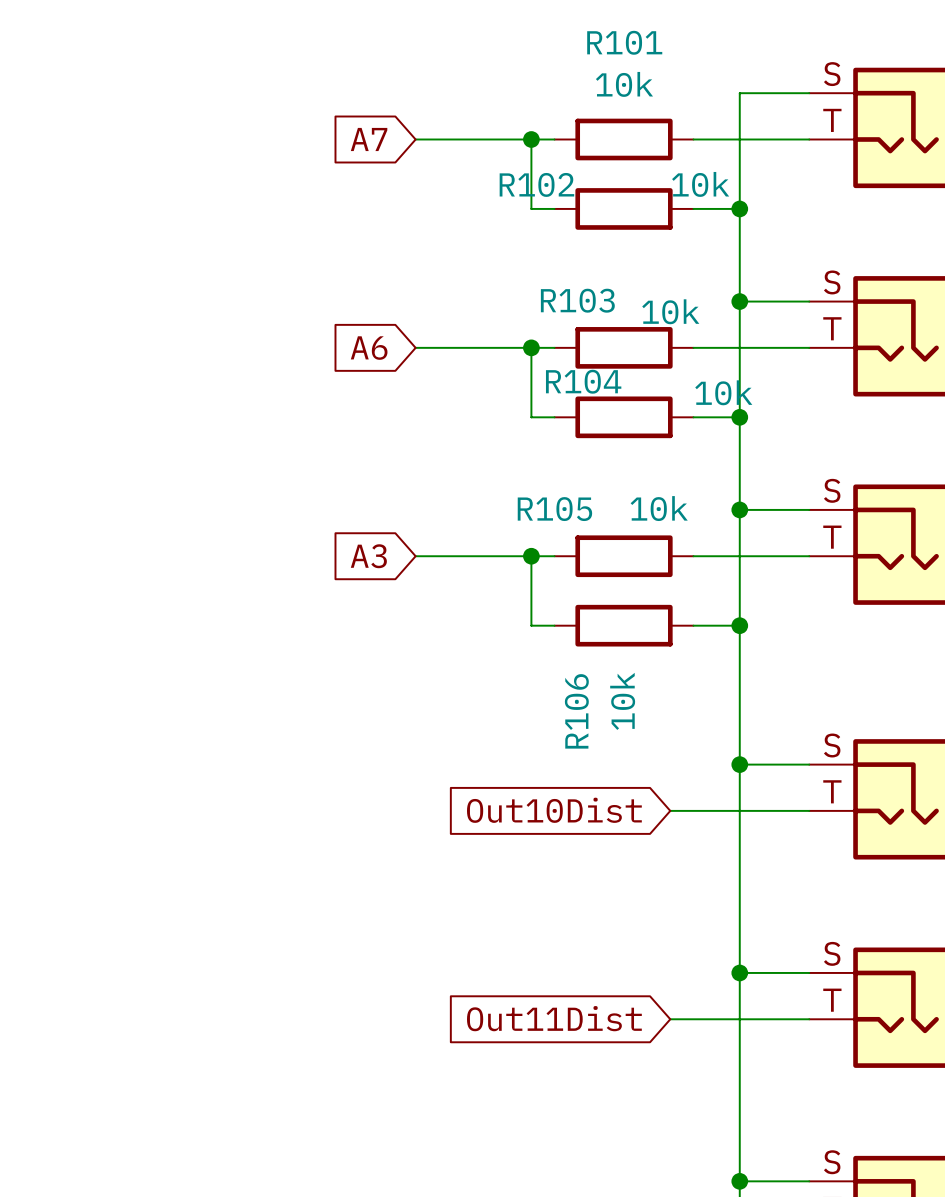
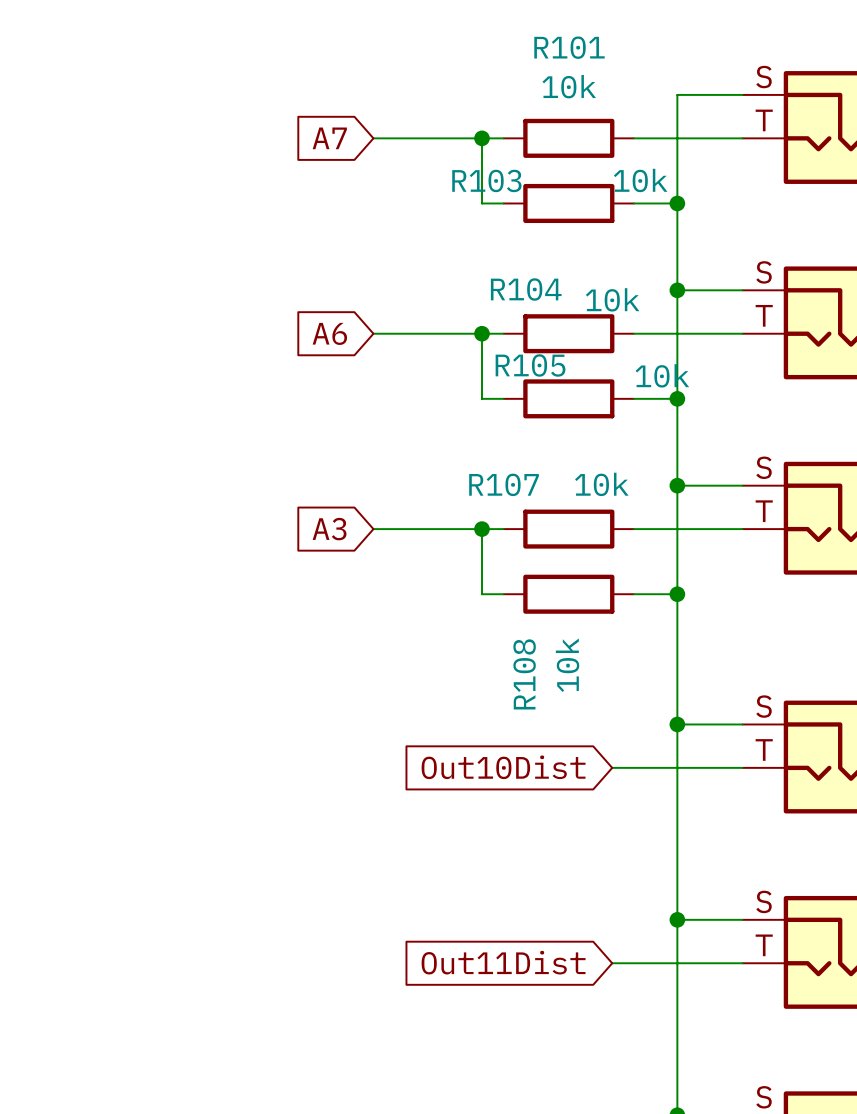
R102 name: R102 (536, 184) -> R103 (486, 180)
R103 name: R103 (577, 300) -> R104 (526, 289)
R104 name: R104 (583, 381) -> R105 (530, 365)
R105 name: R105 (554, 509) -> R107 (504, 484)
R106 name: R106 (576, 711) -> R108 (524, 674)

